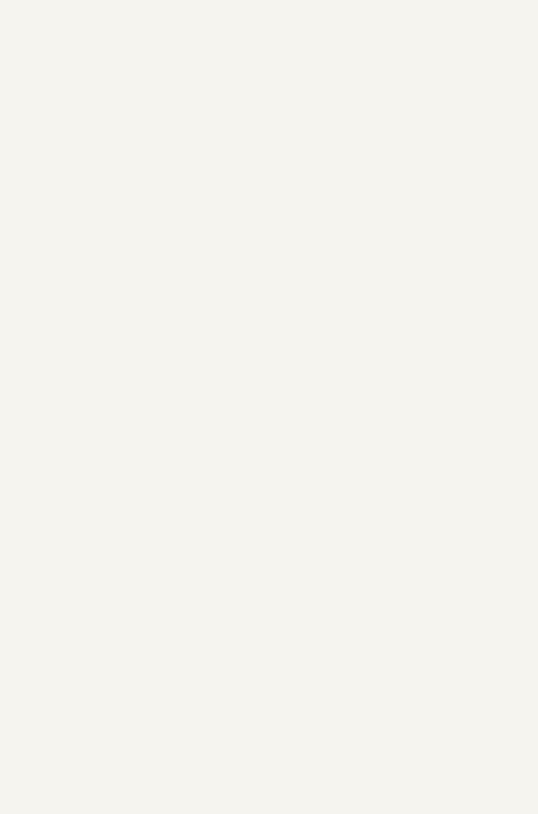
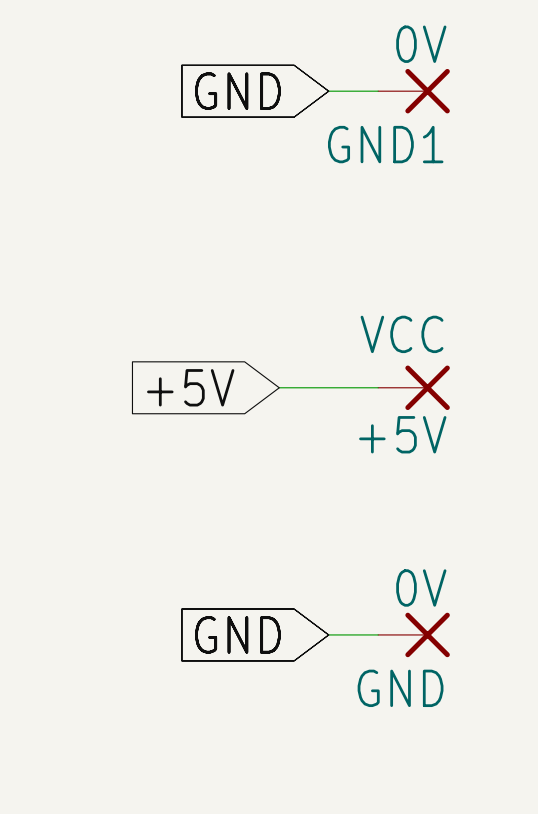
global label: none -> GND (237, 91)
wire: none -> (328, 91) (378, 91)
GND1: none -> 0V (413, 91)
global label: none -> +5V (190, 387)
wire: none -> (279, 387) (378, 387)
VCC: none -> +5V (413, 387)
global label: none -> GND (237, 634)
wire: none -> (328, 634) (378, 634)
GND: none -> 0V (413, 634)

